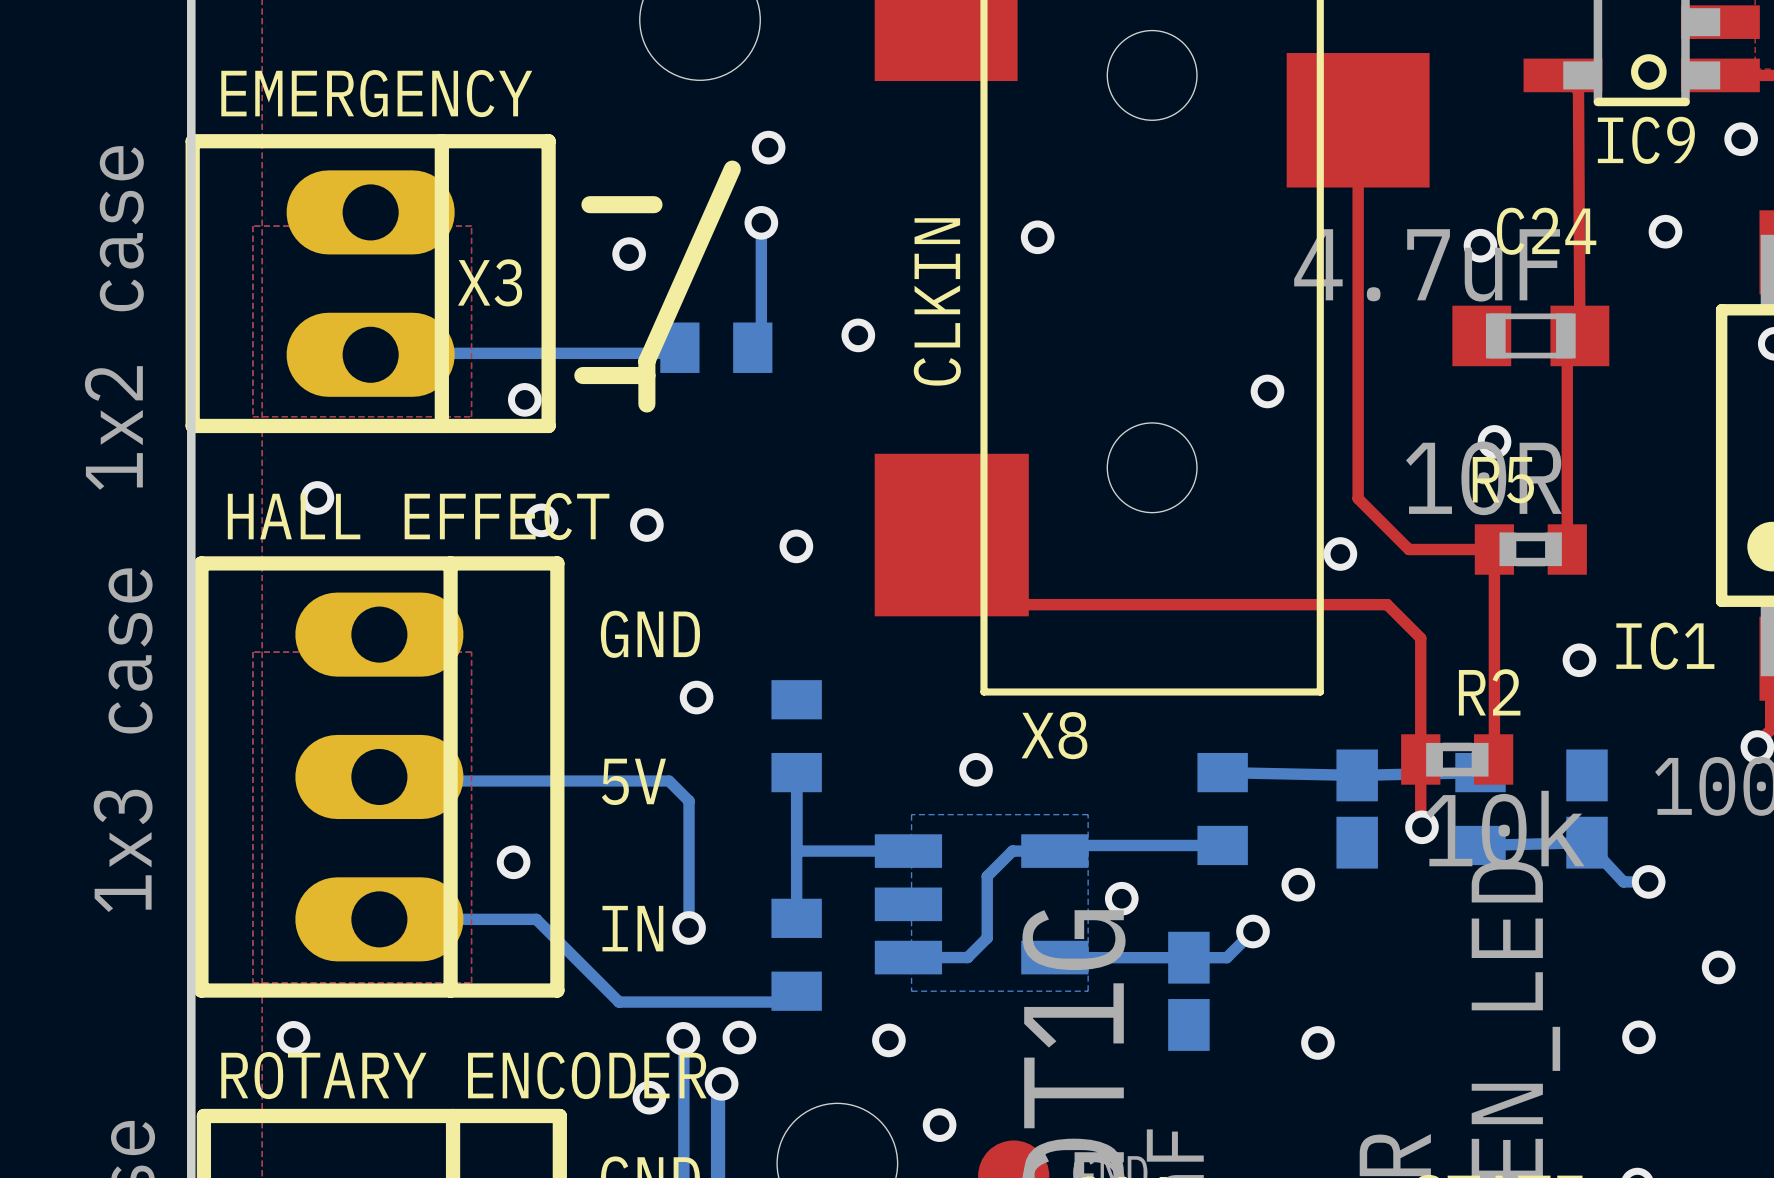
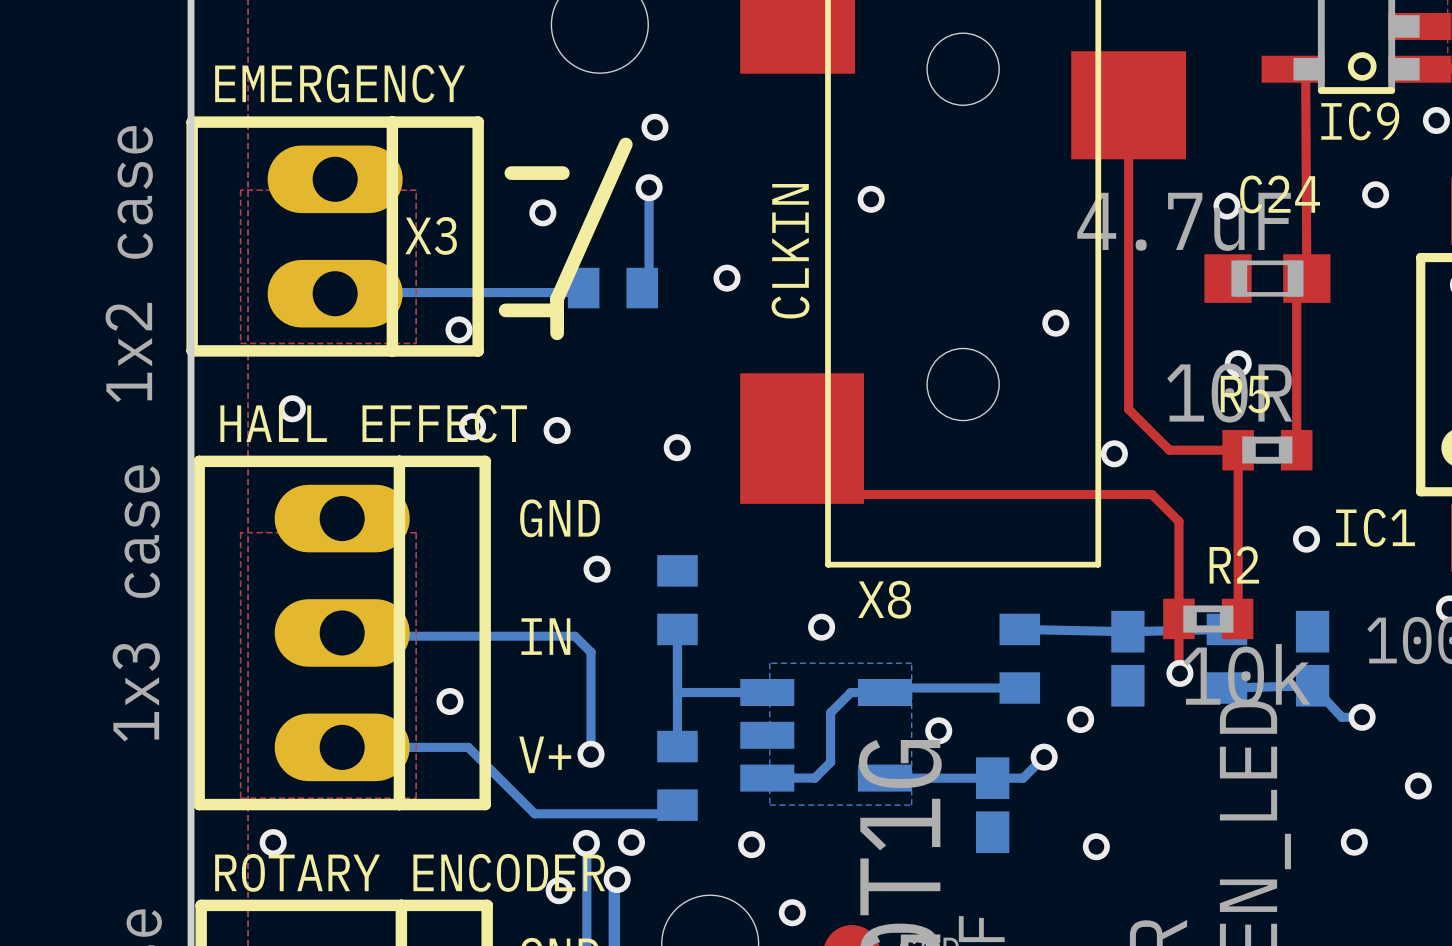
text: 5V (633, 781) -> IN (545, 636)
text: IN (632, 928) -> V+ (545, 754)

